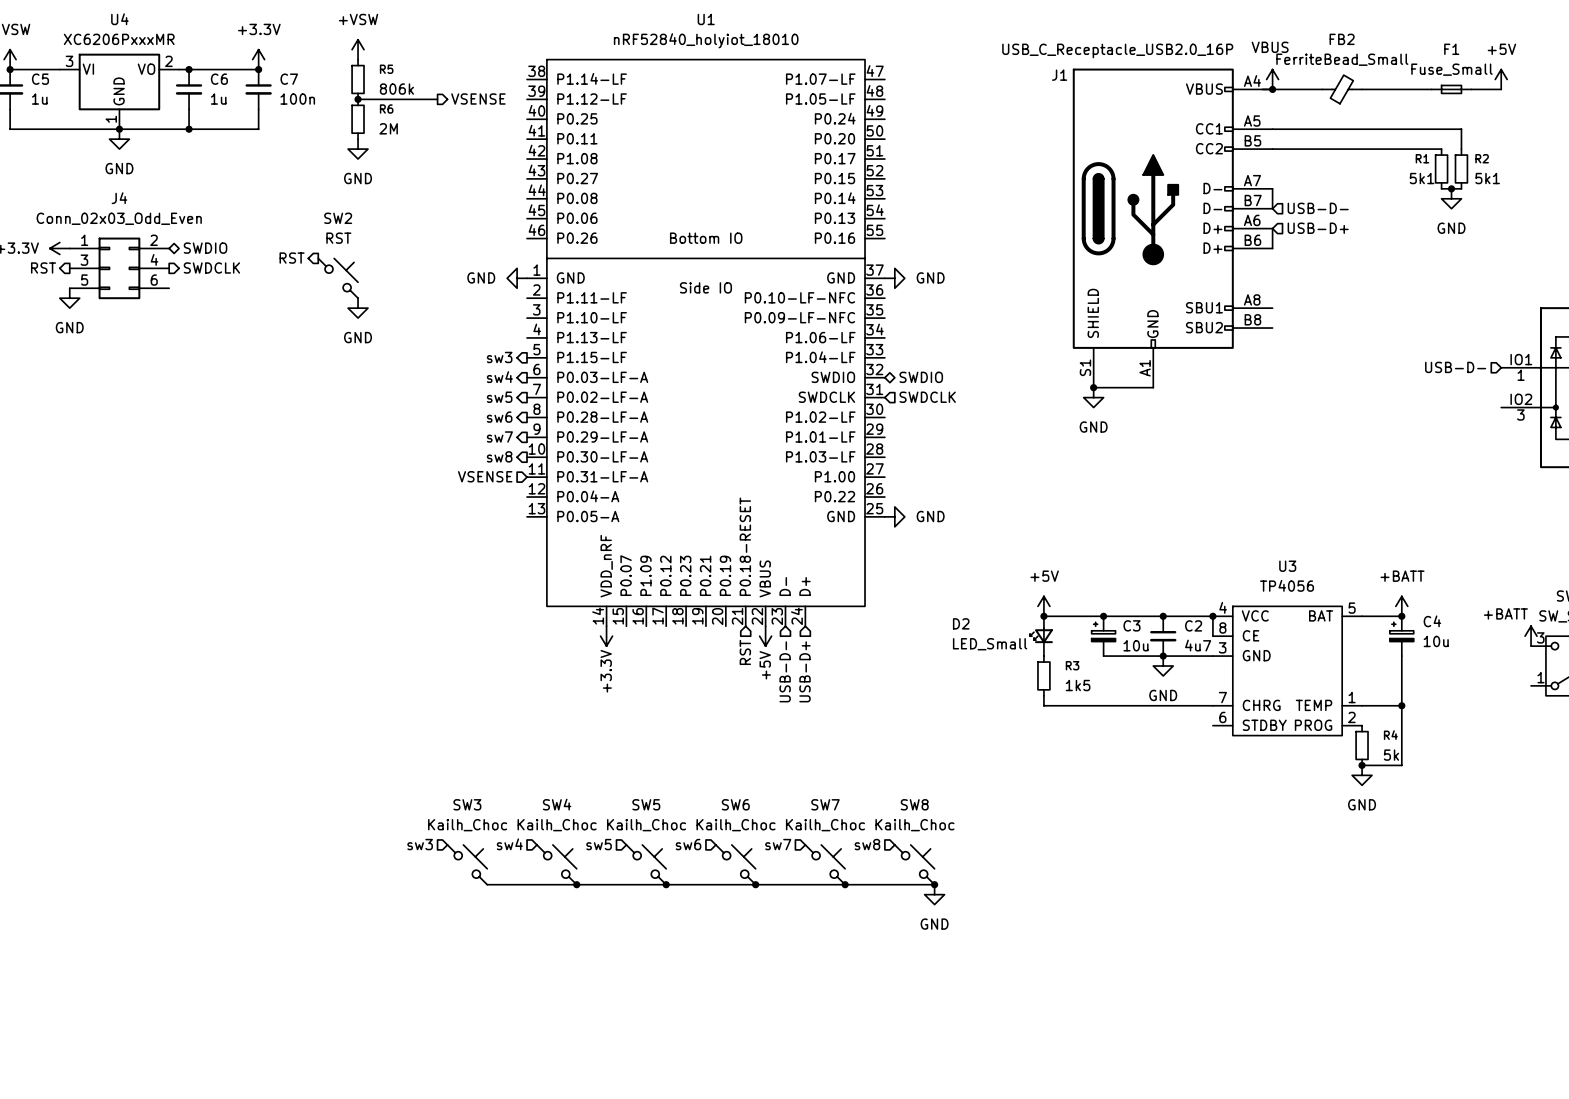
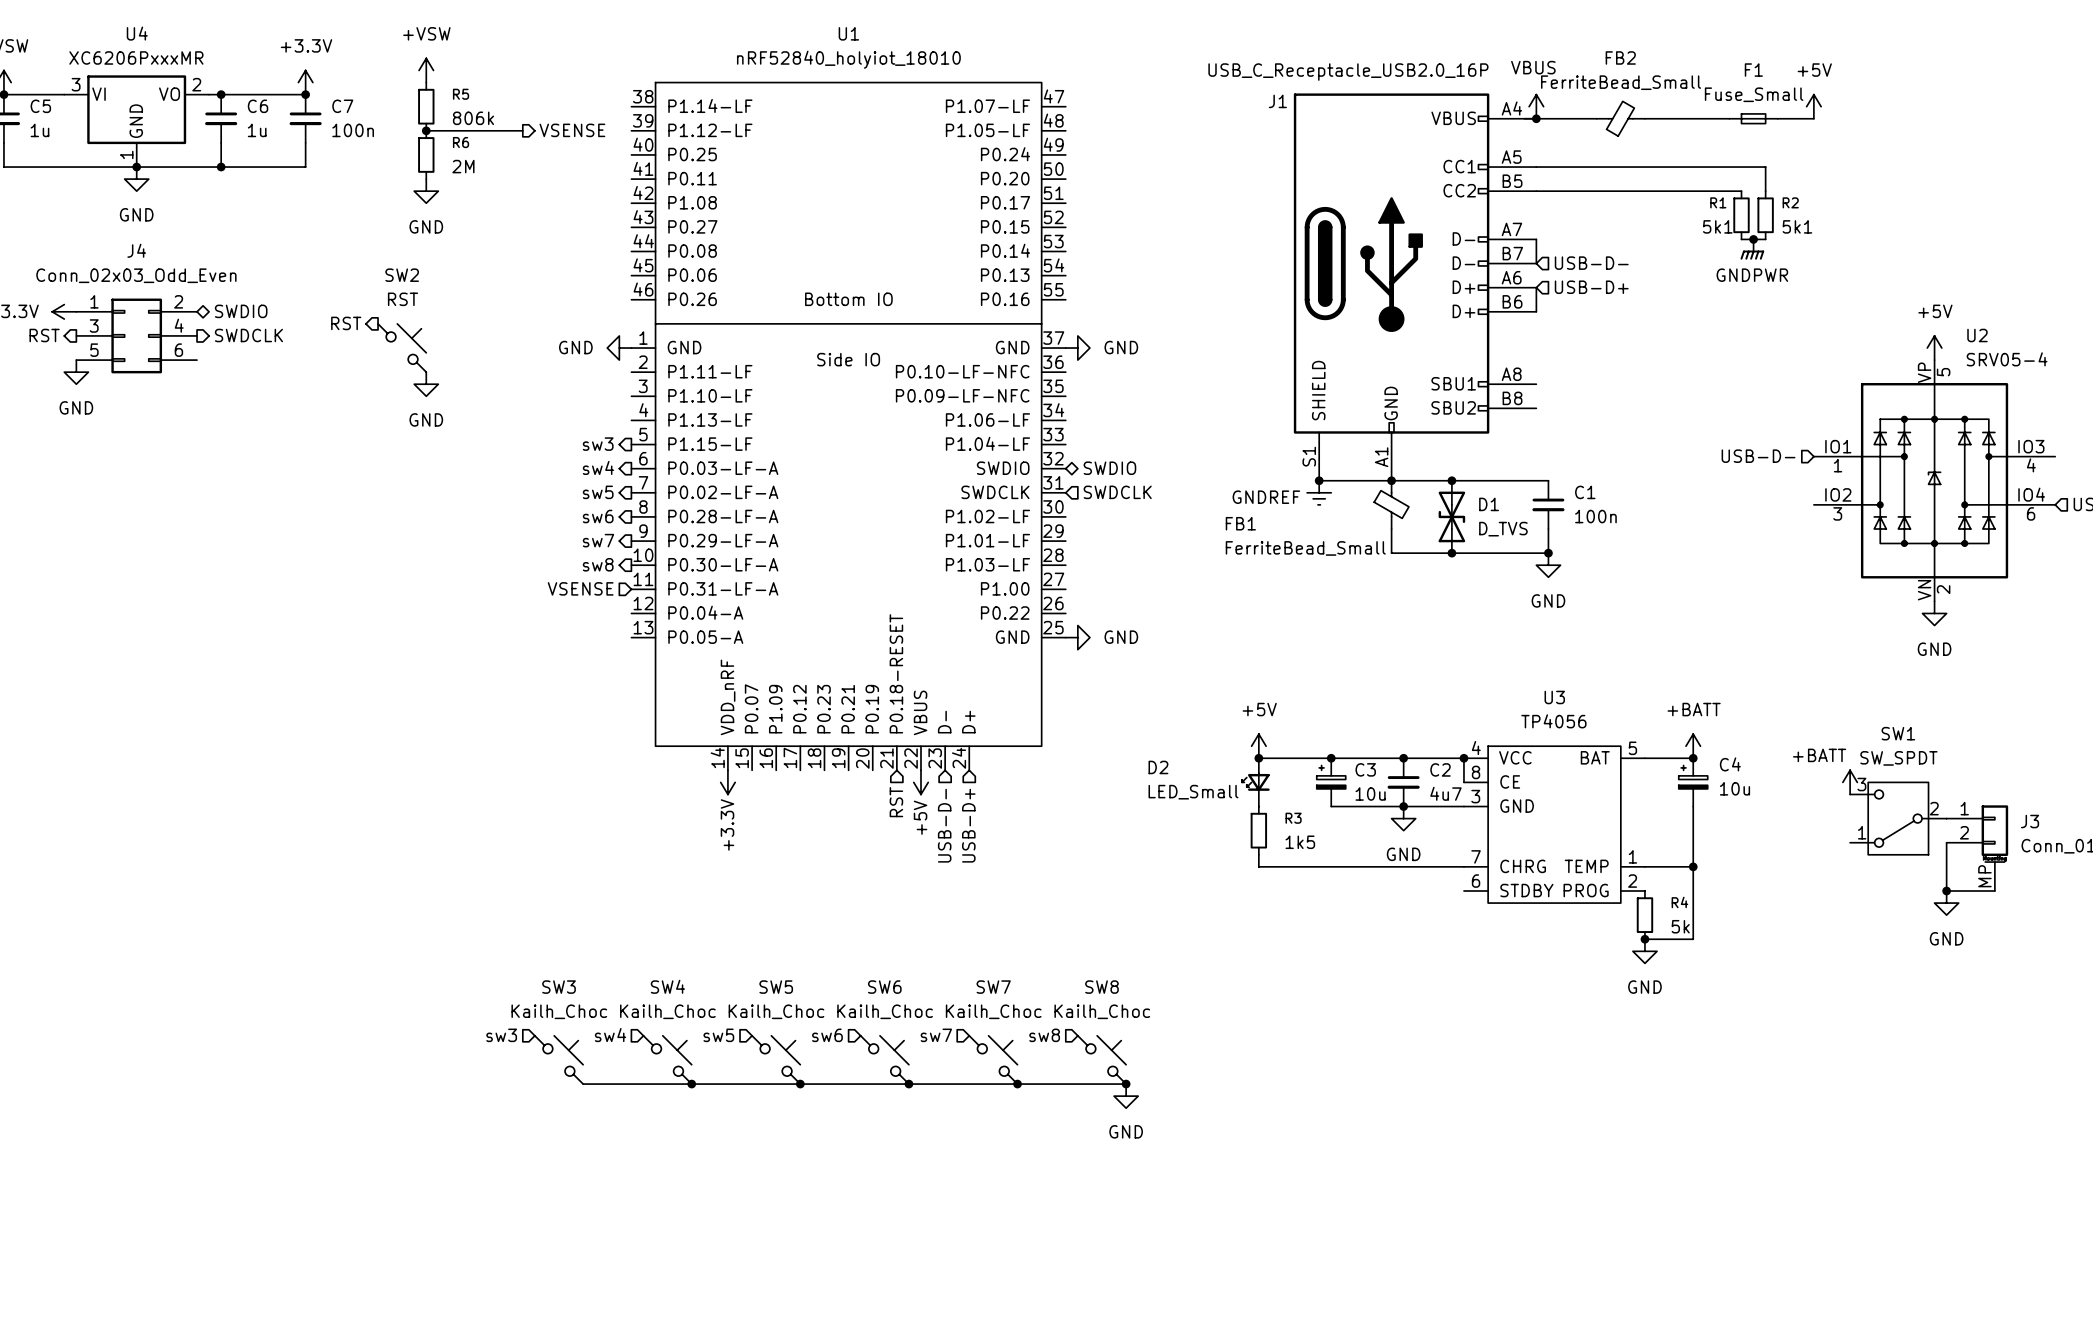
power symbol: GND (1451, 198) -> GNDPWR (1752, 249)
wire: none -> (1391, 480) (1548, 480)
junction: none -> (1391, 480)
junction: none -> (1451, 480)
power symbol: GND (1093, 397) -> GNDREF (1319, 492)
FB1: none -> FerriteBead_Small (1391, 504)
C1: none -> 100n (1548, 504)
D1: none -> D_TVS (1451, 516)
wire: none -> (1391, 529) (1391, 553) (1548, 553) (1548, 529)
junction: none -> (1451, 553)
junction: none -> (1548, 553)
power symbol: none -> GND (1548, 565)

